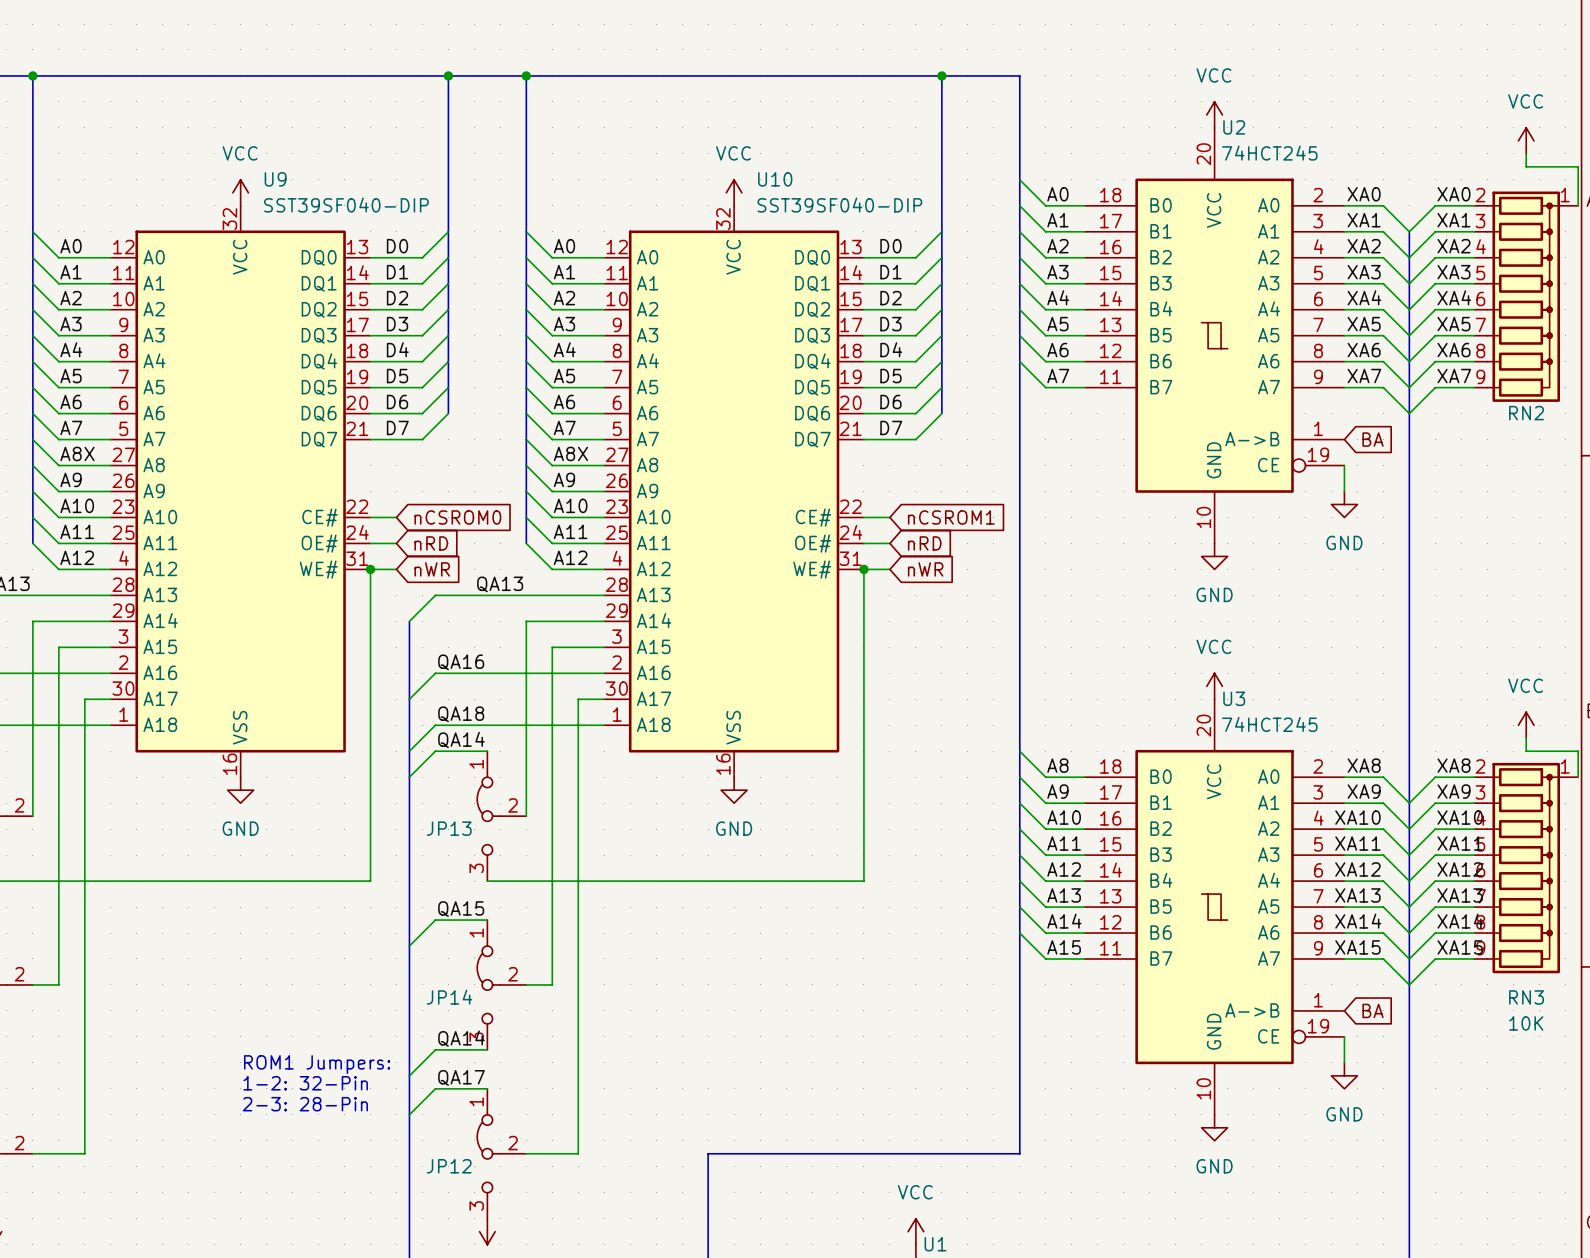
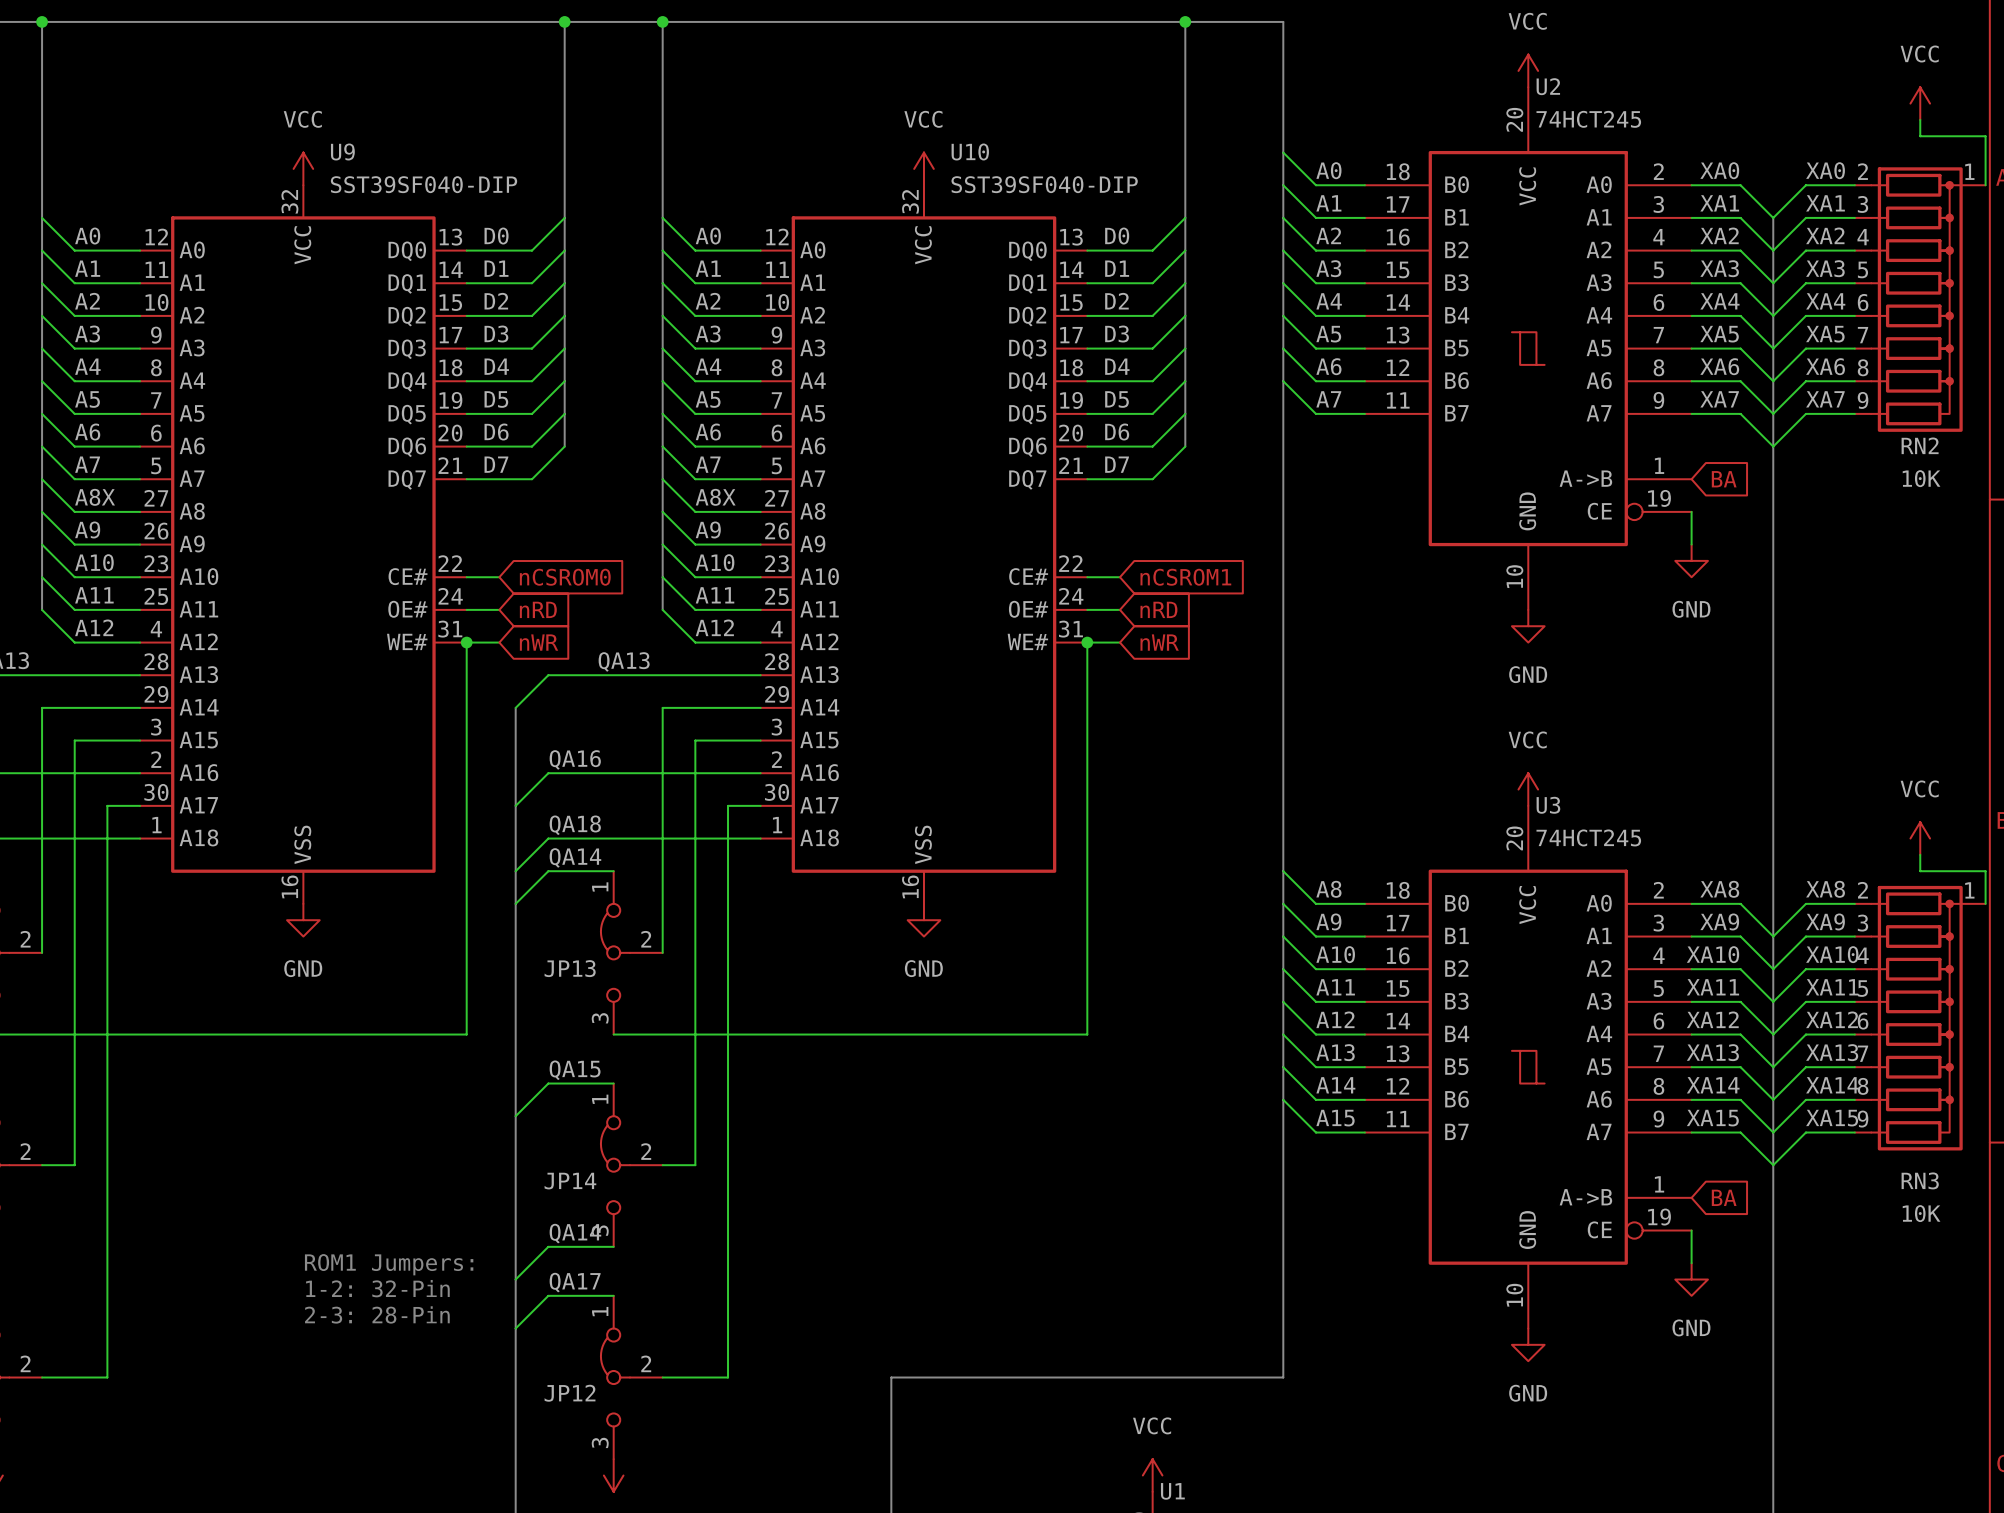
RN2 value: none -> 10K (1921, 478)

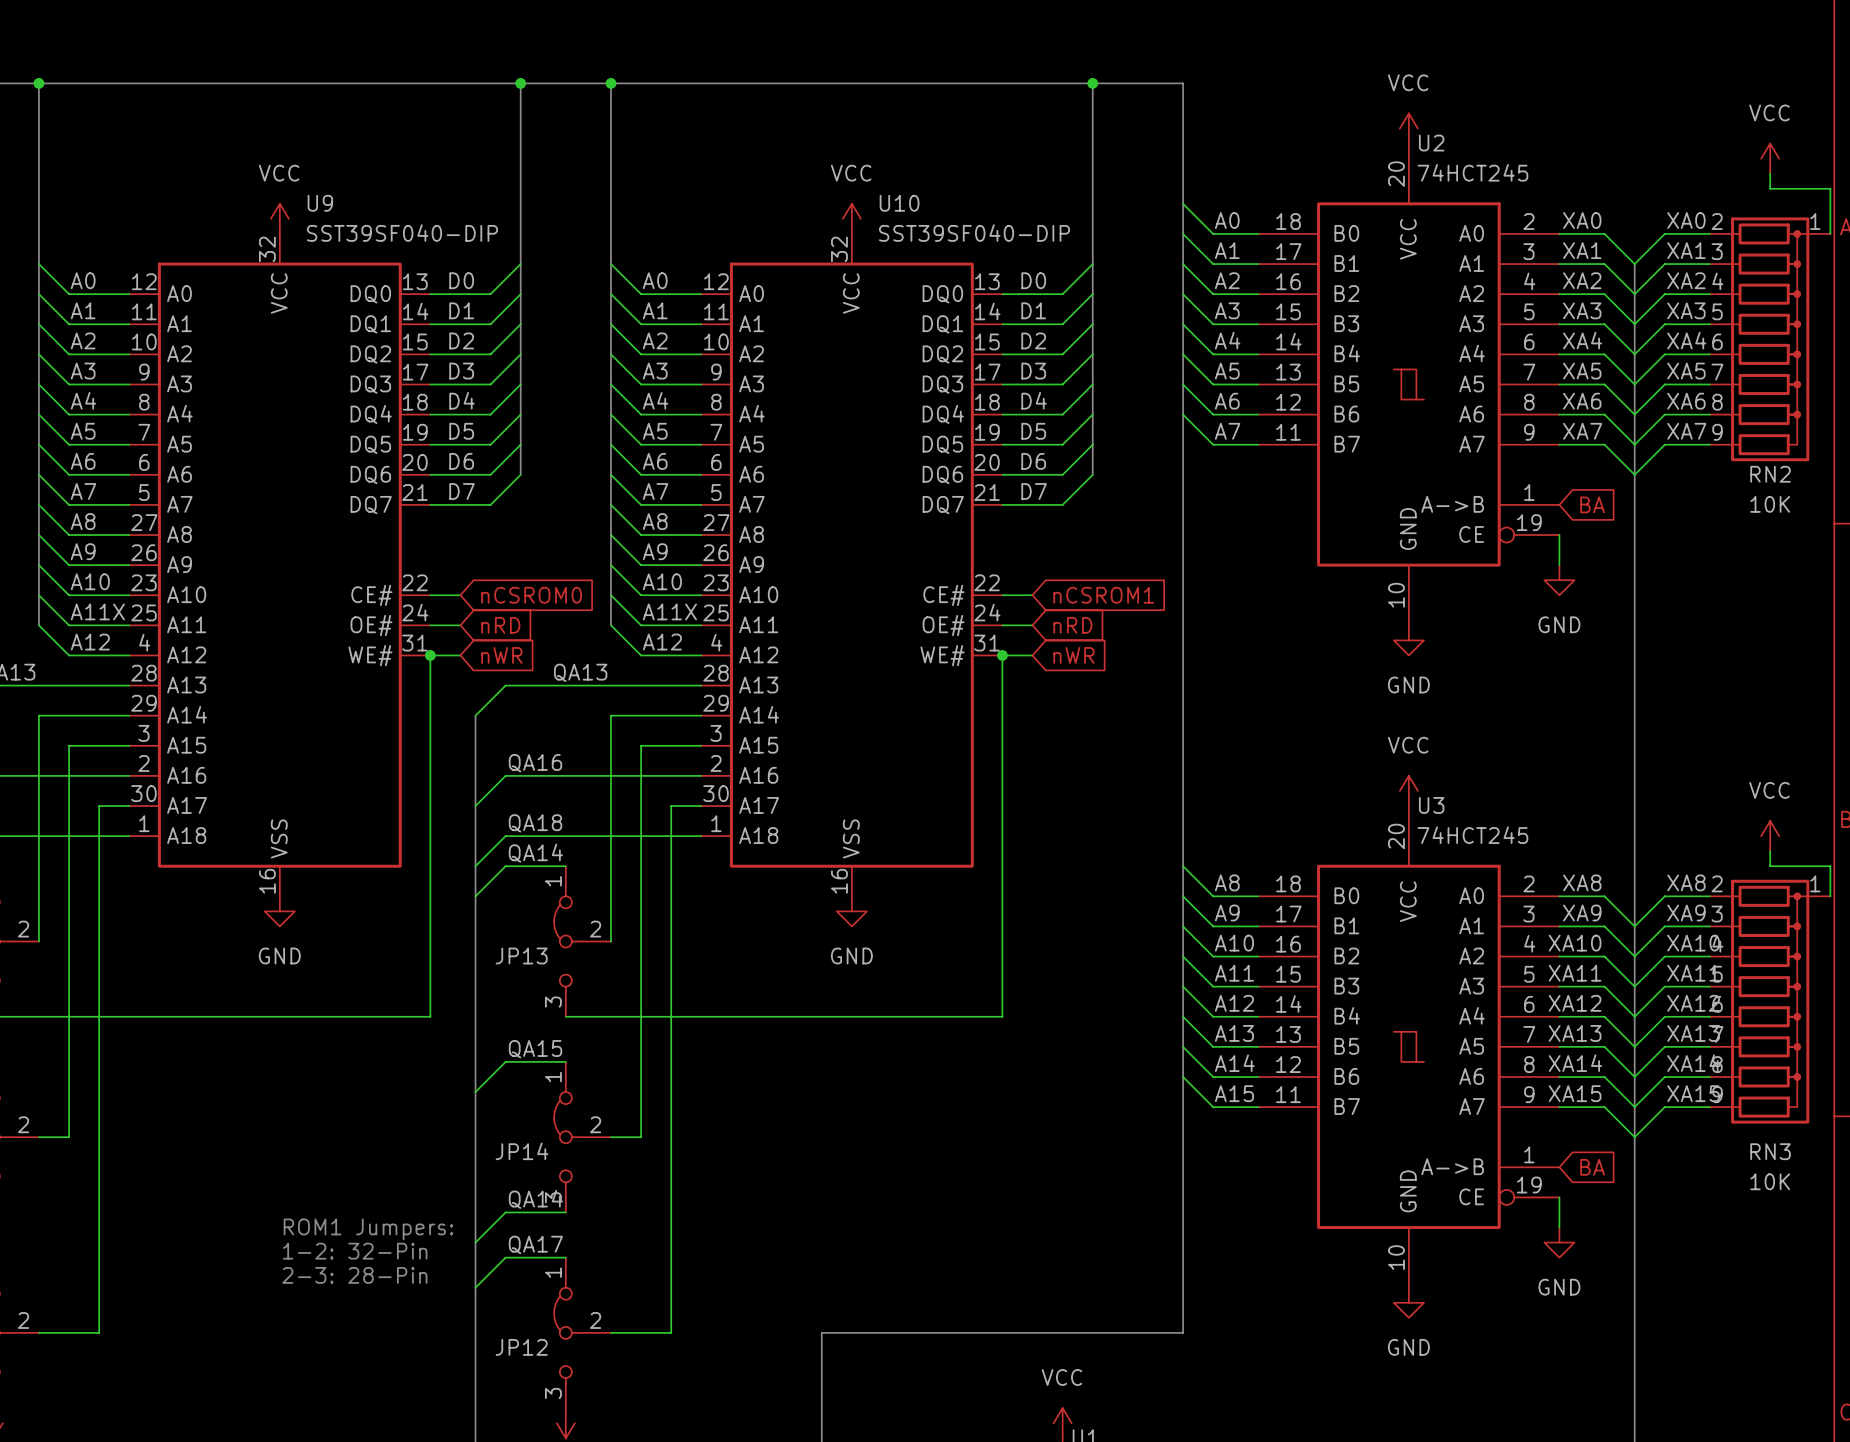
label: A8X (95, 497) -> A8 (83, 521)
label: A8X (715, 497) -> A8 (655, 521)
label: A11 (94, 595) -> A11X (97, 611)
label: A11 (715, 595) -> A11X (669, 611)

